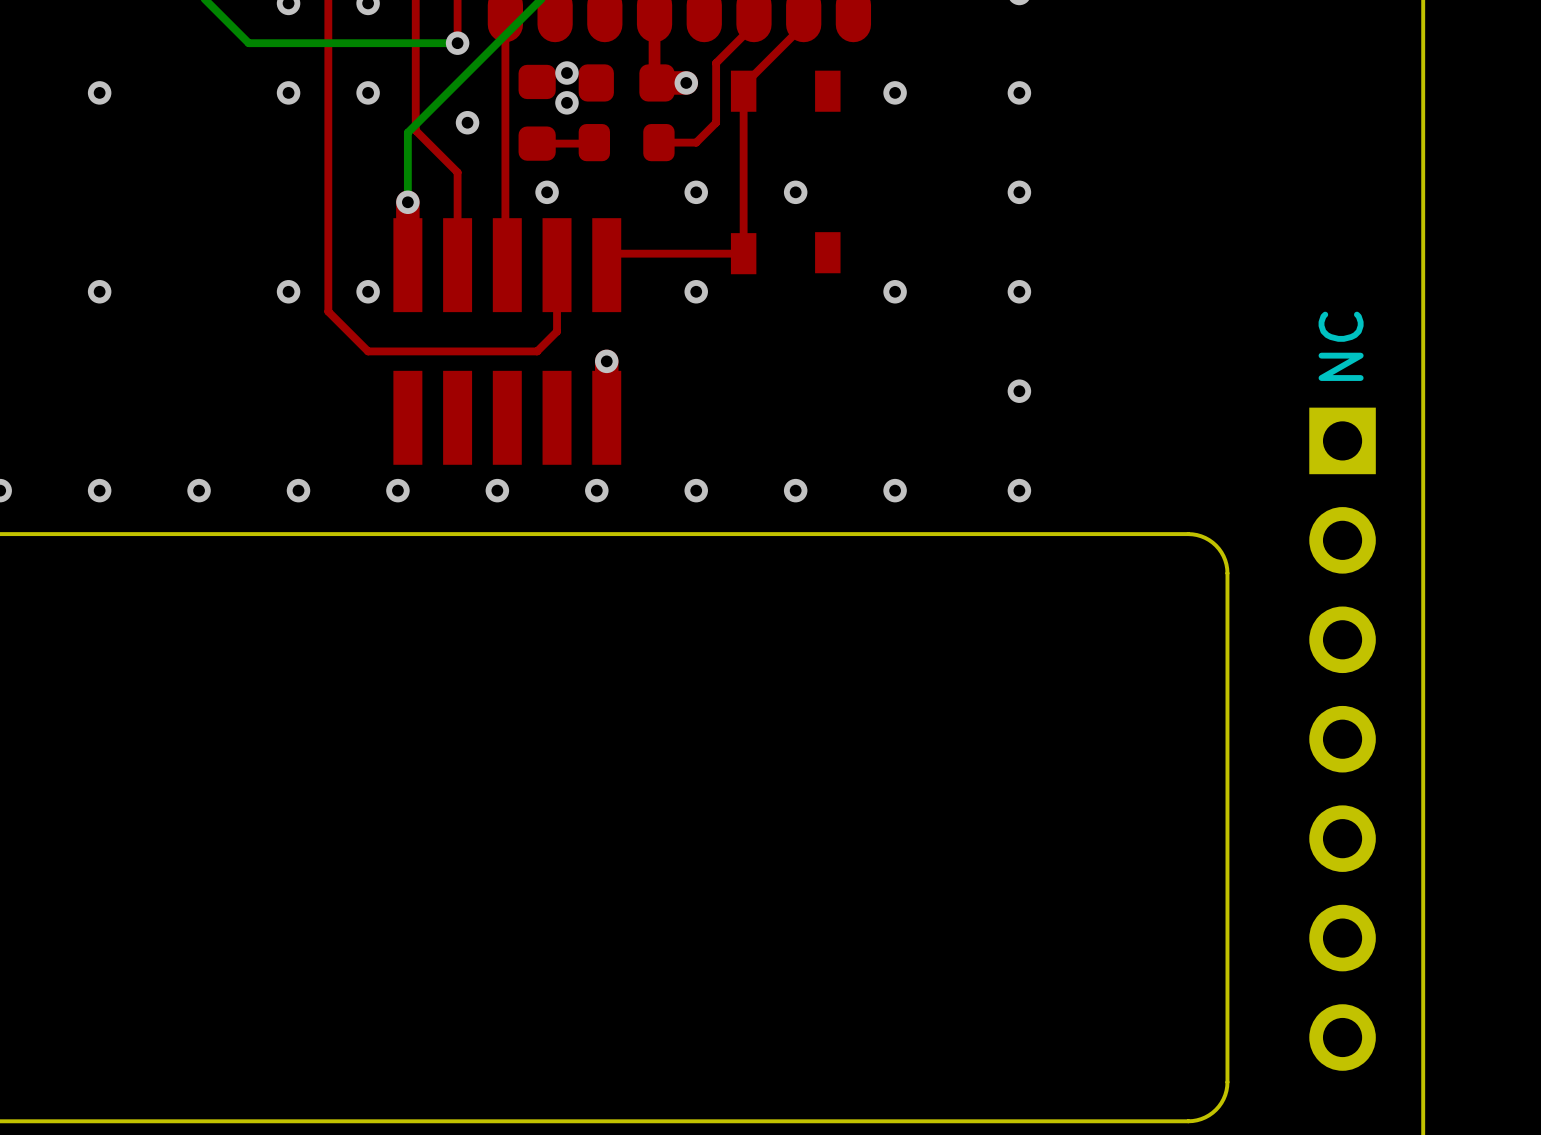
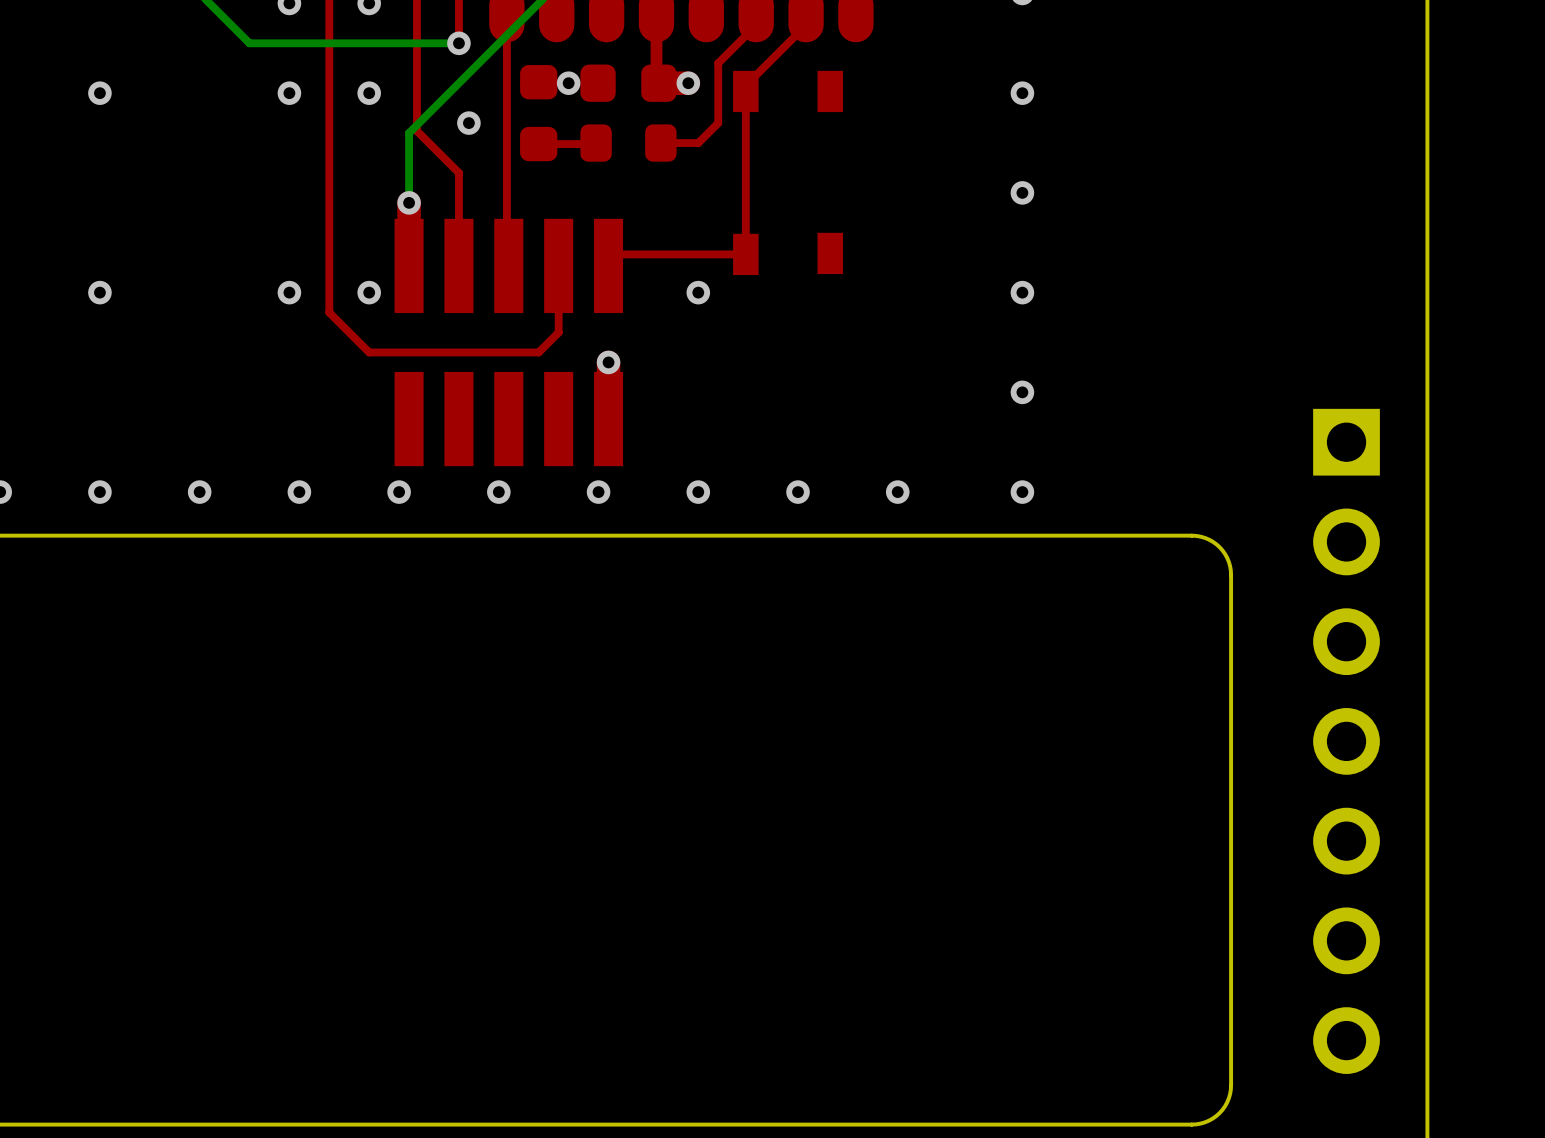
via: (566, 73) -> none
via: none -> (568, 83)
via: (895, 92) -> none
via: (566, 102) -> none
via: (547, 192) -> none
via: (696, 192) -> none
via: (795, 192) -> none
via: (895, 291) -> none
text: NC (1341, 346) -> none

